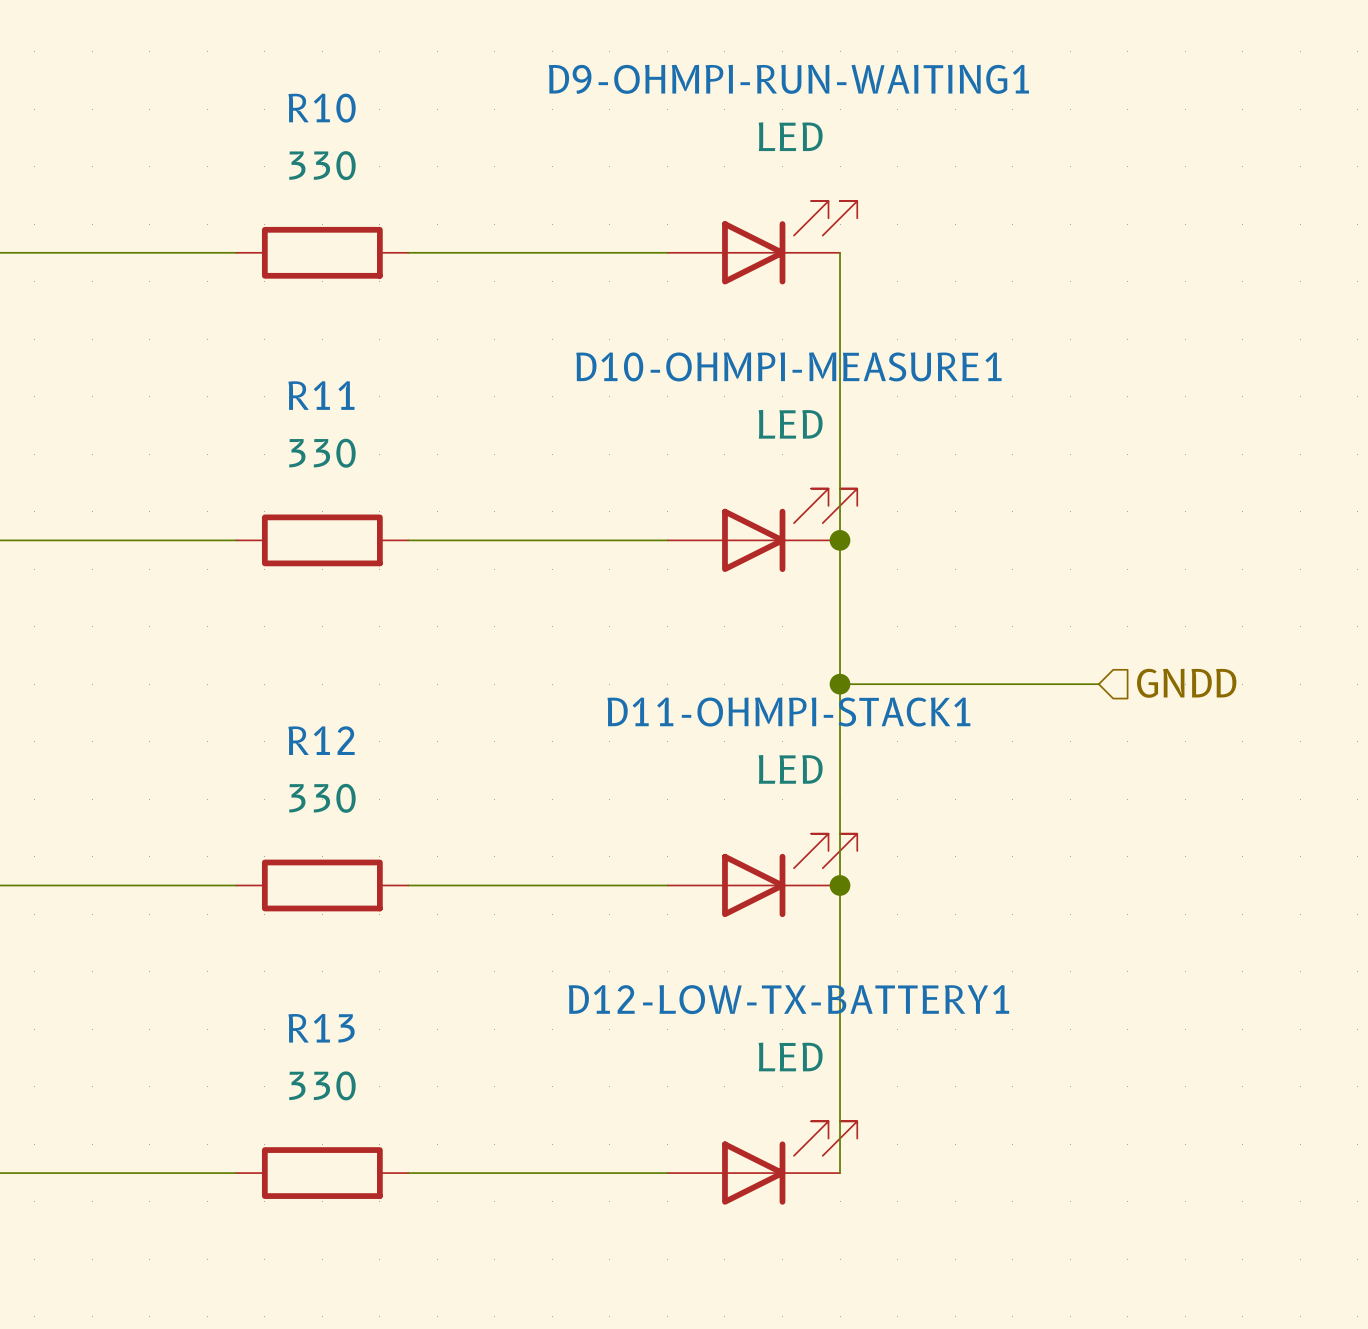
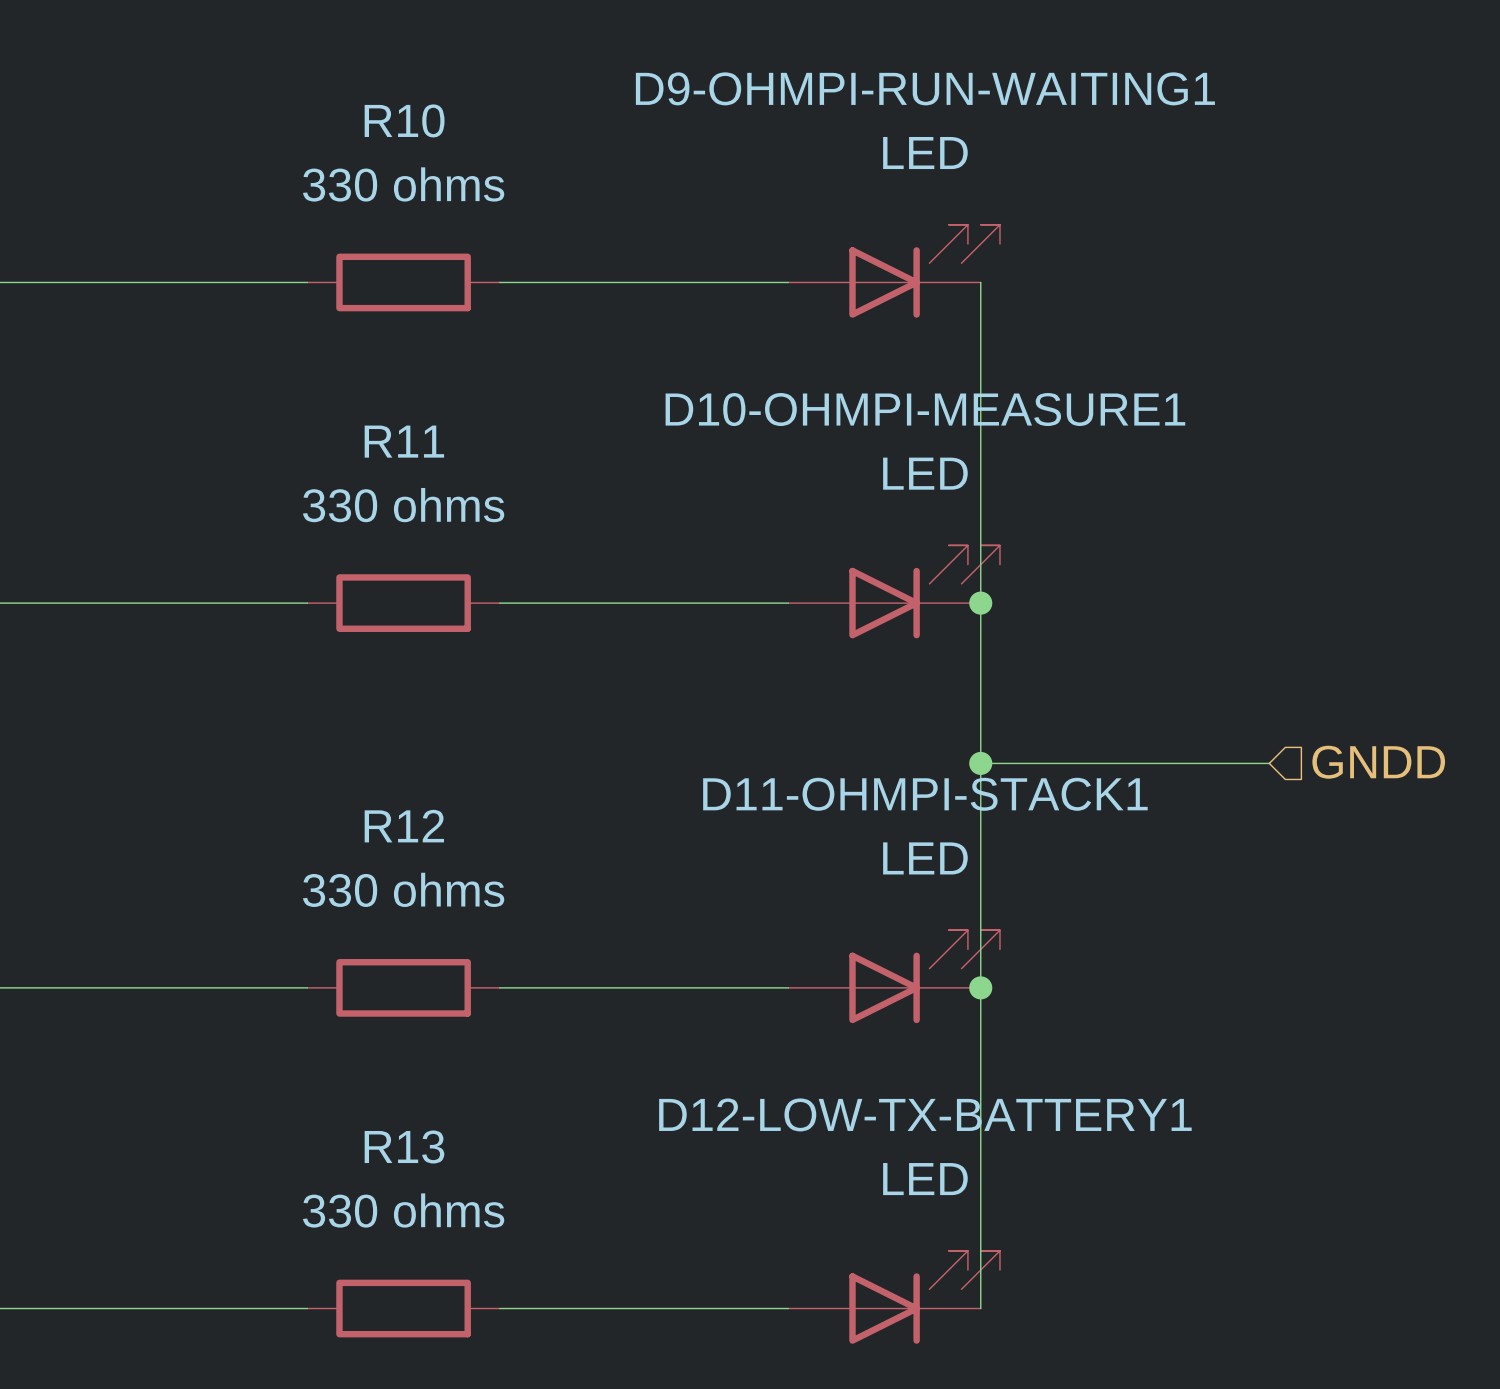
R10 value: 330 (322, 165) -> 330 ohms (403, 184)
R11 value: 330 (322, 453) -> 330 ohms (403, 505)
R12 value: 330 (322, 798) -> 330 ohms (403, 889)
R13 value: 330 (322, 1085) -> 330 ohms (403, 1210)

